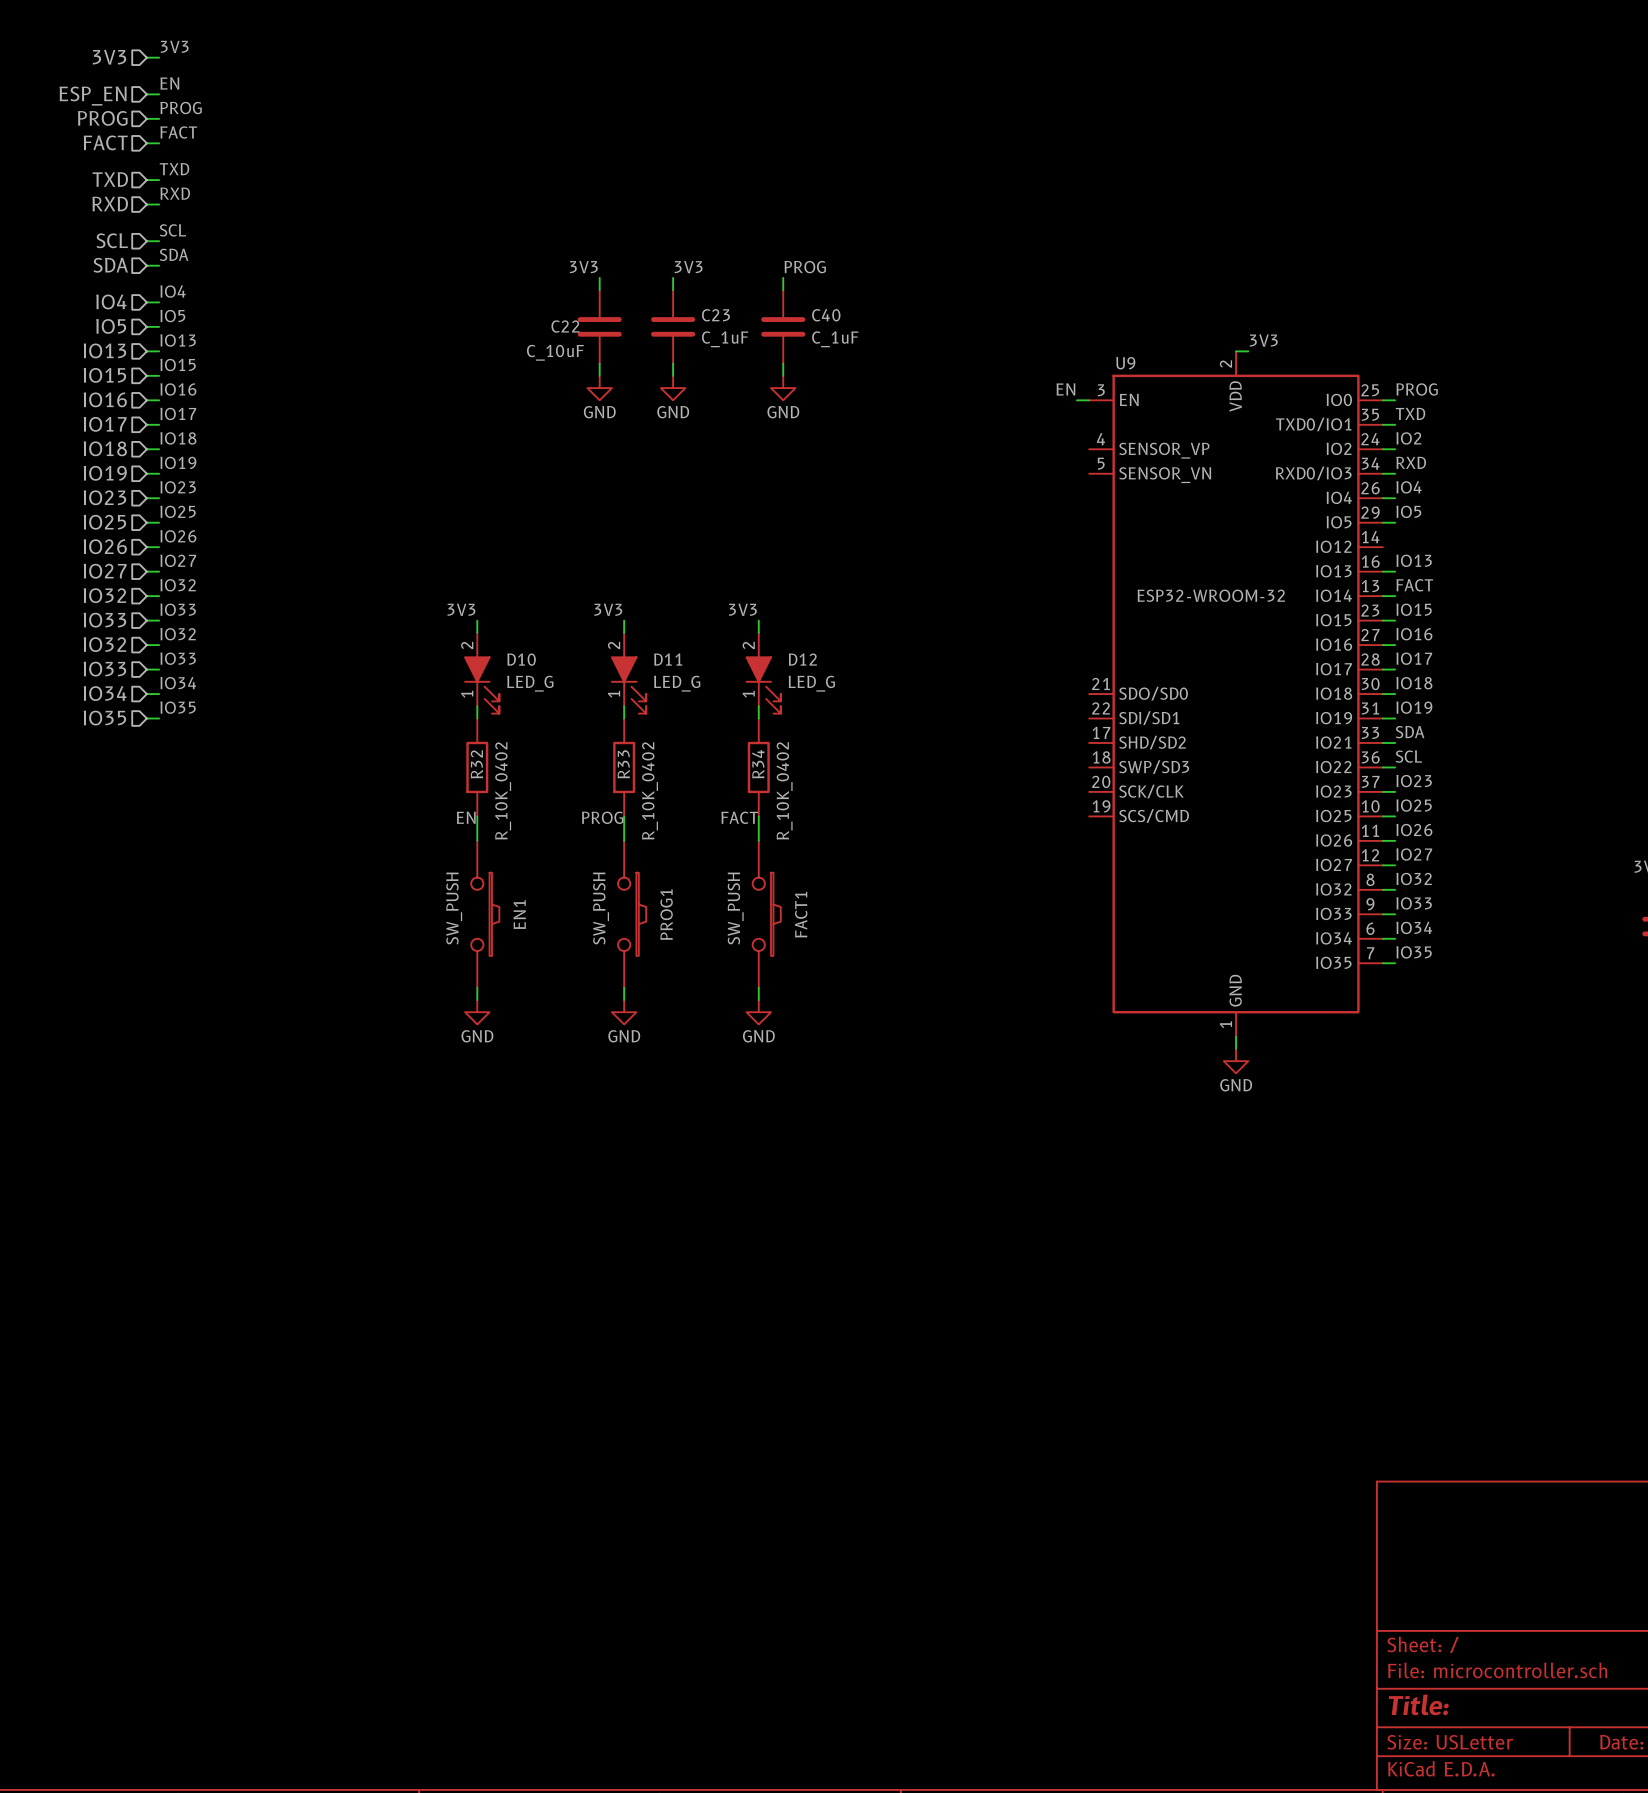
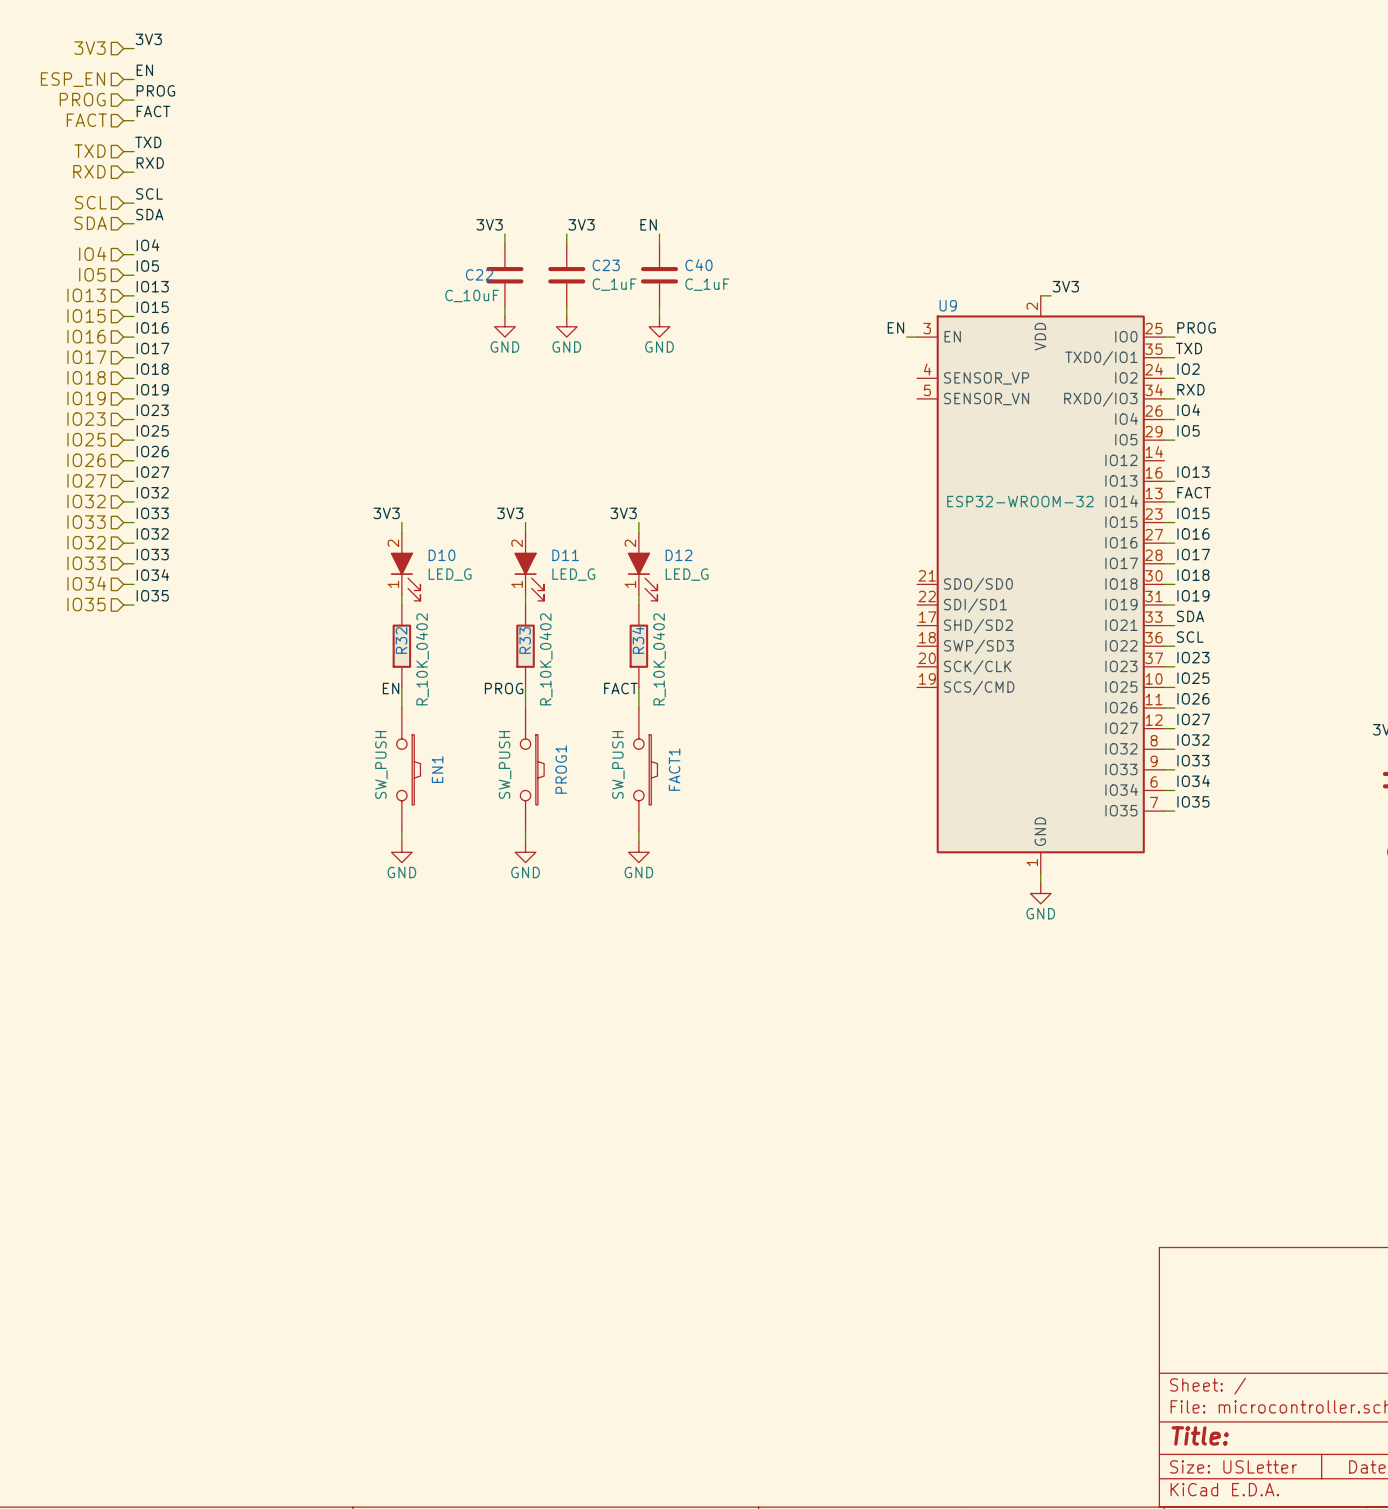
label: PROG (805, 267) -> EN (648, 224)

